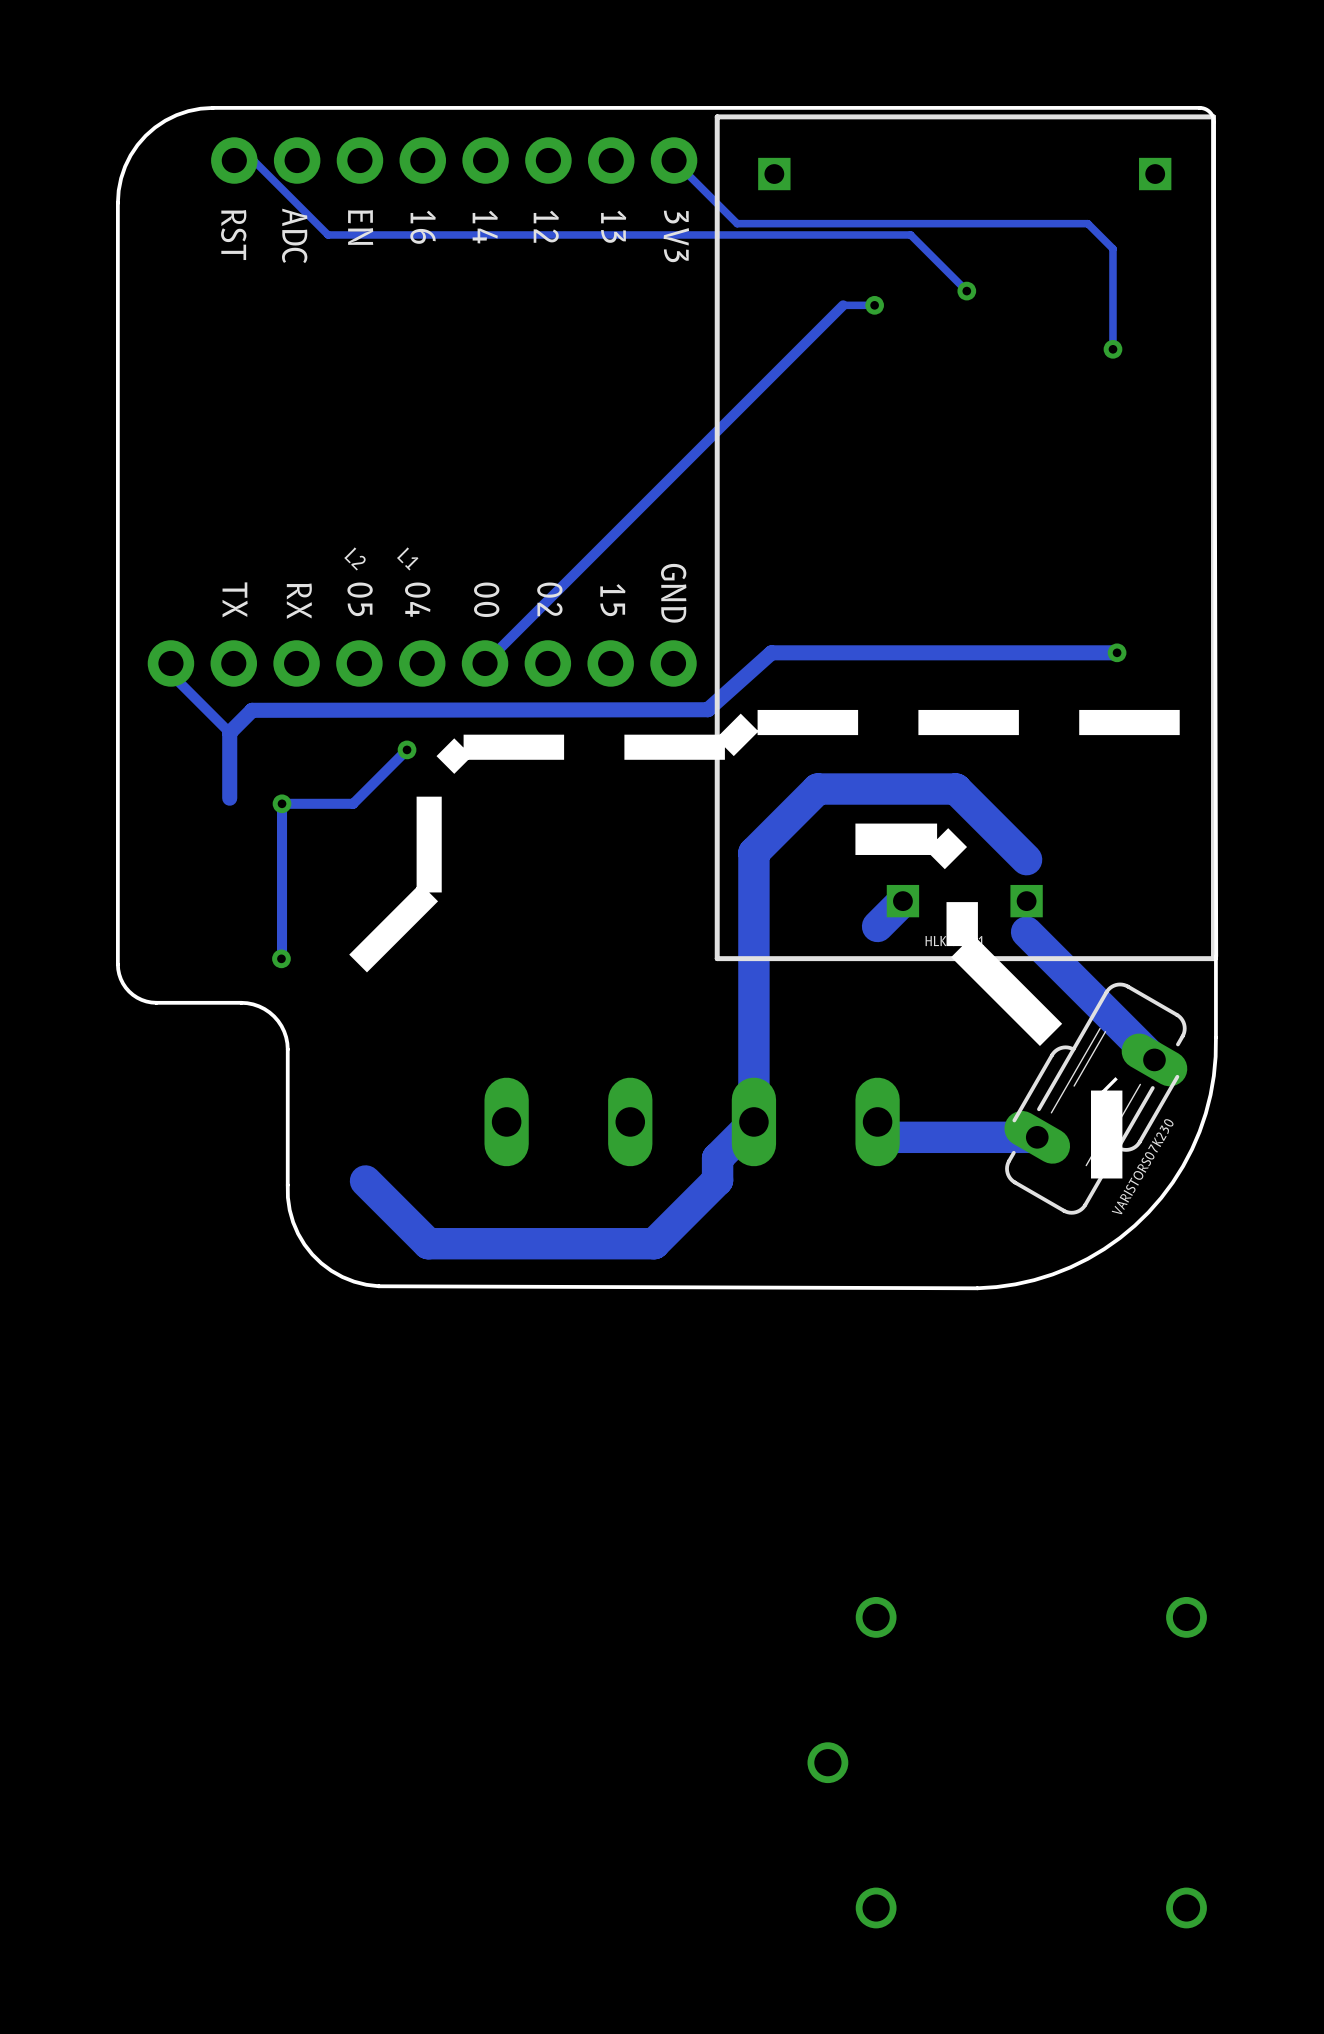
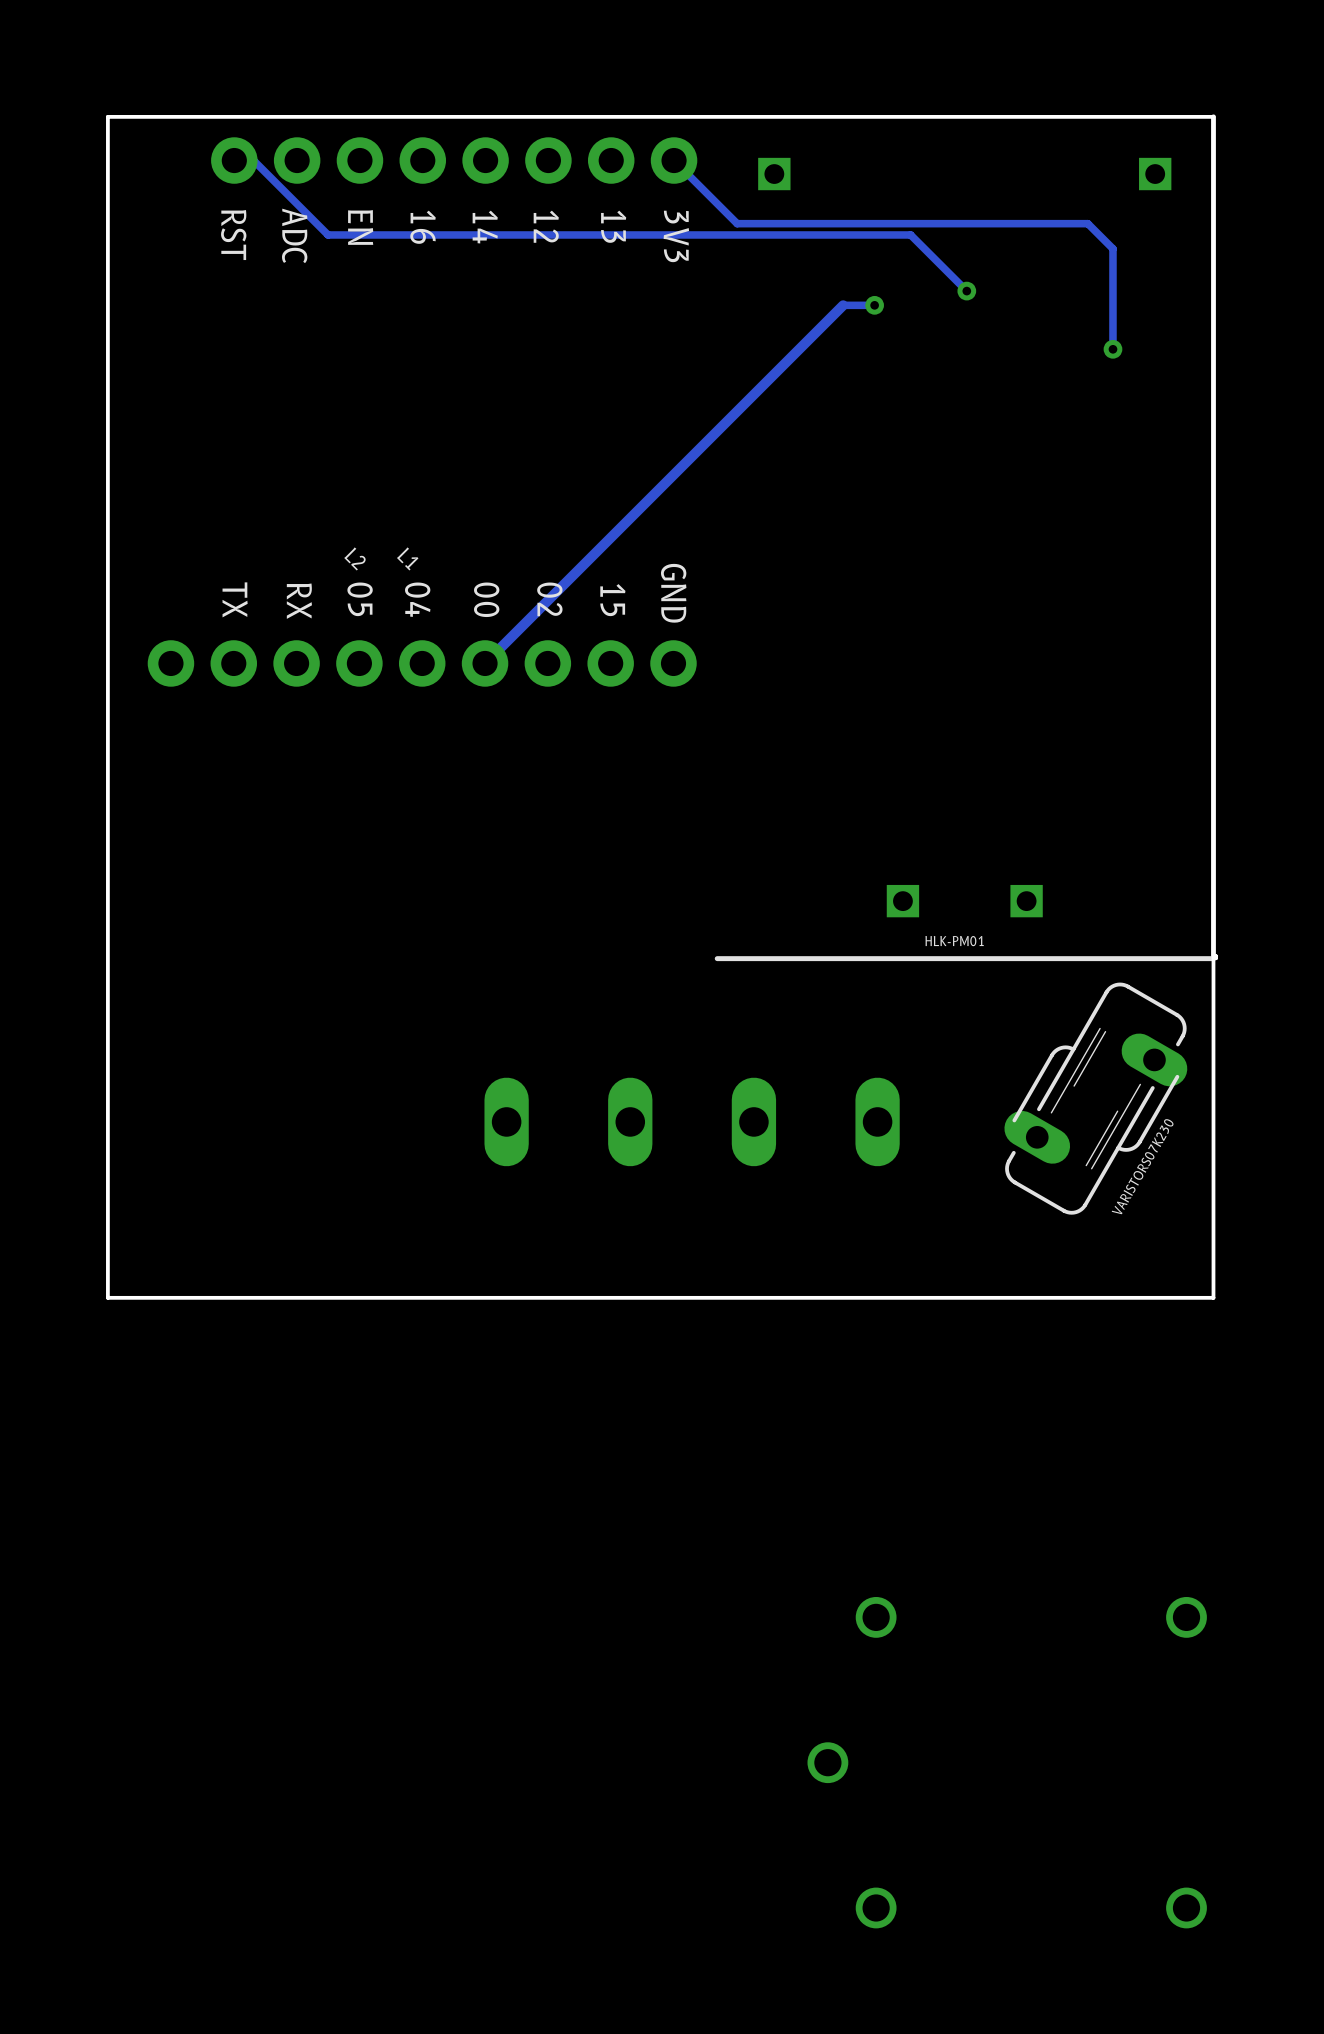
board edge: none -> (1213, 116) (1213, 1297) (107, 1297) (107, 116) (1213, 116)
line: (1213, 116) (717, 116) (717, 958) -> none
track: (1117, 652) (771, 652) (707, 709) (252, 710) (229, 732) -> none
via: (1117, 652) -> none
track: (170, 663) (170, 673) (229, 732) -> none
board edge: (1179, 722) (749, 722) (724, 747) (463, 747) (445, 765) -> none
track: (229, 732) (229, 798) -> none
track: (407, 749) (353, 803) (282, 803) (281, 958) -> none
via: (407, 749) -> none
board edge: (429, 796) (429, 892) (315, 1005) -> none
via: (282, 803) -> none
board edge: (855, 839) (937, 839) (955, 858) -> none
track: (1026, 859) (955, 789) (817, 789) (753, 852) (753, 1121) (717, 1158) (717, 1180) (654, 1243) (428, 1243) (365, 1180) -> none
track: (902, 901) (877, 926) -> none
board edge: (962, 902) (962, 946) (1106, 1090) (1106, 1178) -> none
track: (1026, 932) (1154, 1059) -> none
board edge: (1216, 956) (1213, 122) (1208, 110) (1199, 107) (212, 107) (200, 108) (176, 115) (155, 127) (137, 145) (130, 155) (121, 178) (117, 202) (118, 969) (125, 987) (132, 994) (146, 1001) (247, 1003) (264, 1009) (278, 1021) (286, 1037) (287, 1049) (287, 1185) (289, 1210) (293, 1222) (304, 1244) (321, 1263) (331, 1270) (354, 1281) (378, 1286) (977, 1288) (1015, 1284) (1052, 1274) (1087, 1258) (1119, 1237) (1134, 1225) (1148, 1212) (1172, 1182) (1192, 1149) (1205, 1113) (1213, 1075) (1215, 958) -> none
via: (281, 958) -> none
track: (1037, 1137) (892, 1137) -> none

